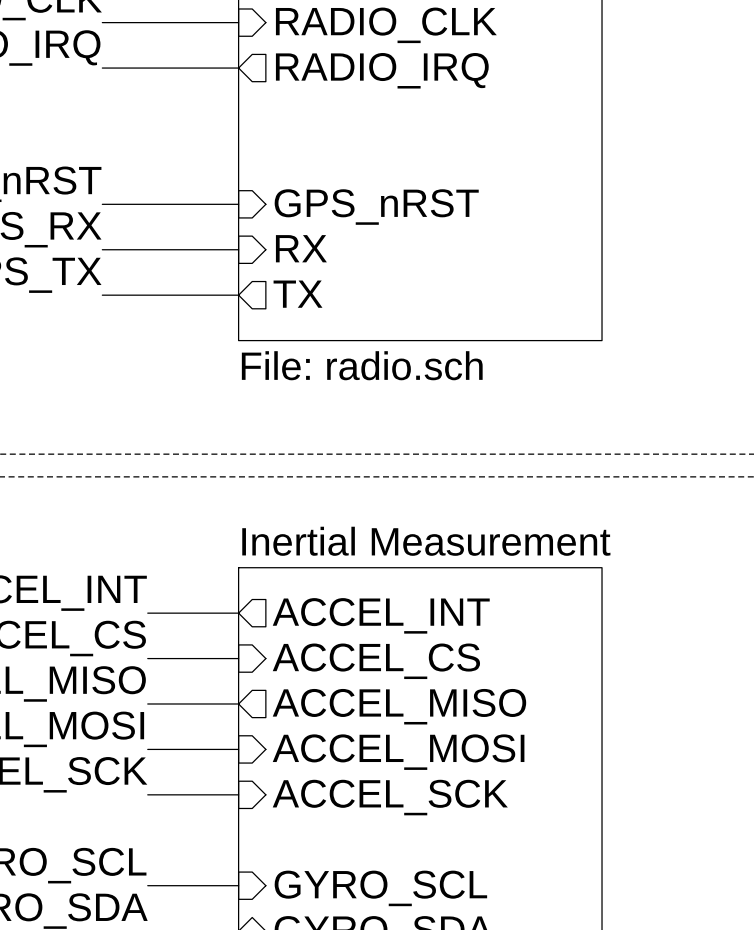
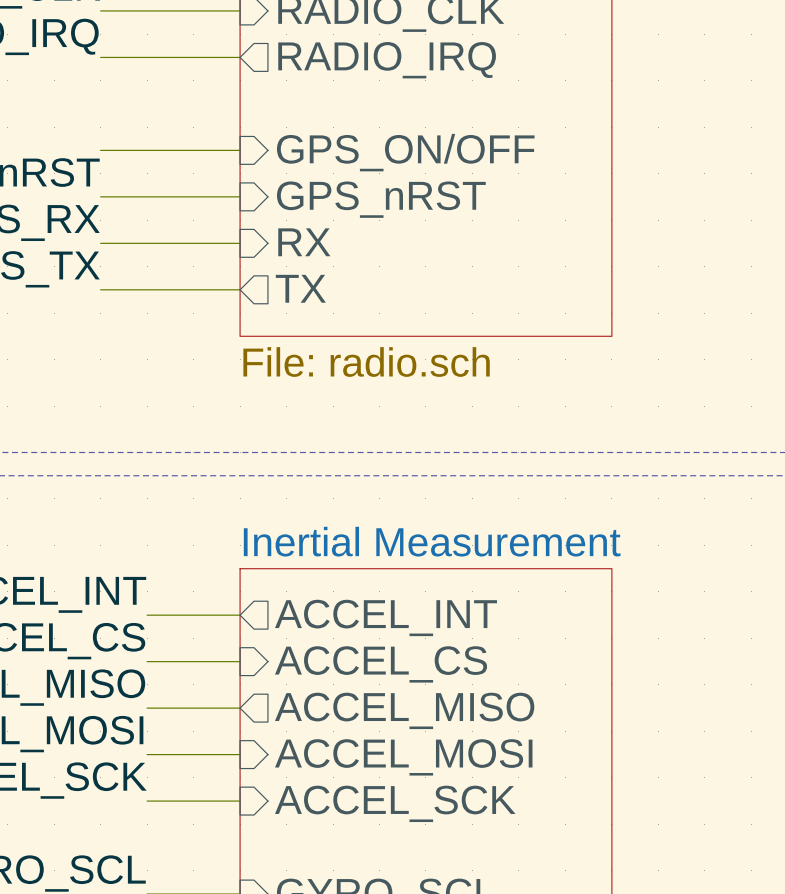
wire: none -> (100, 150) (240, 150)
sheet pin: none -> GPS_ON/OFF (405, 152)

